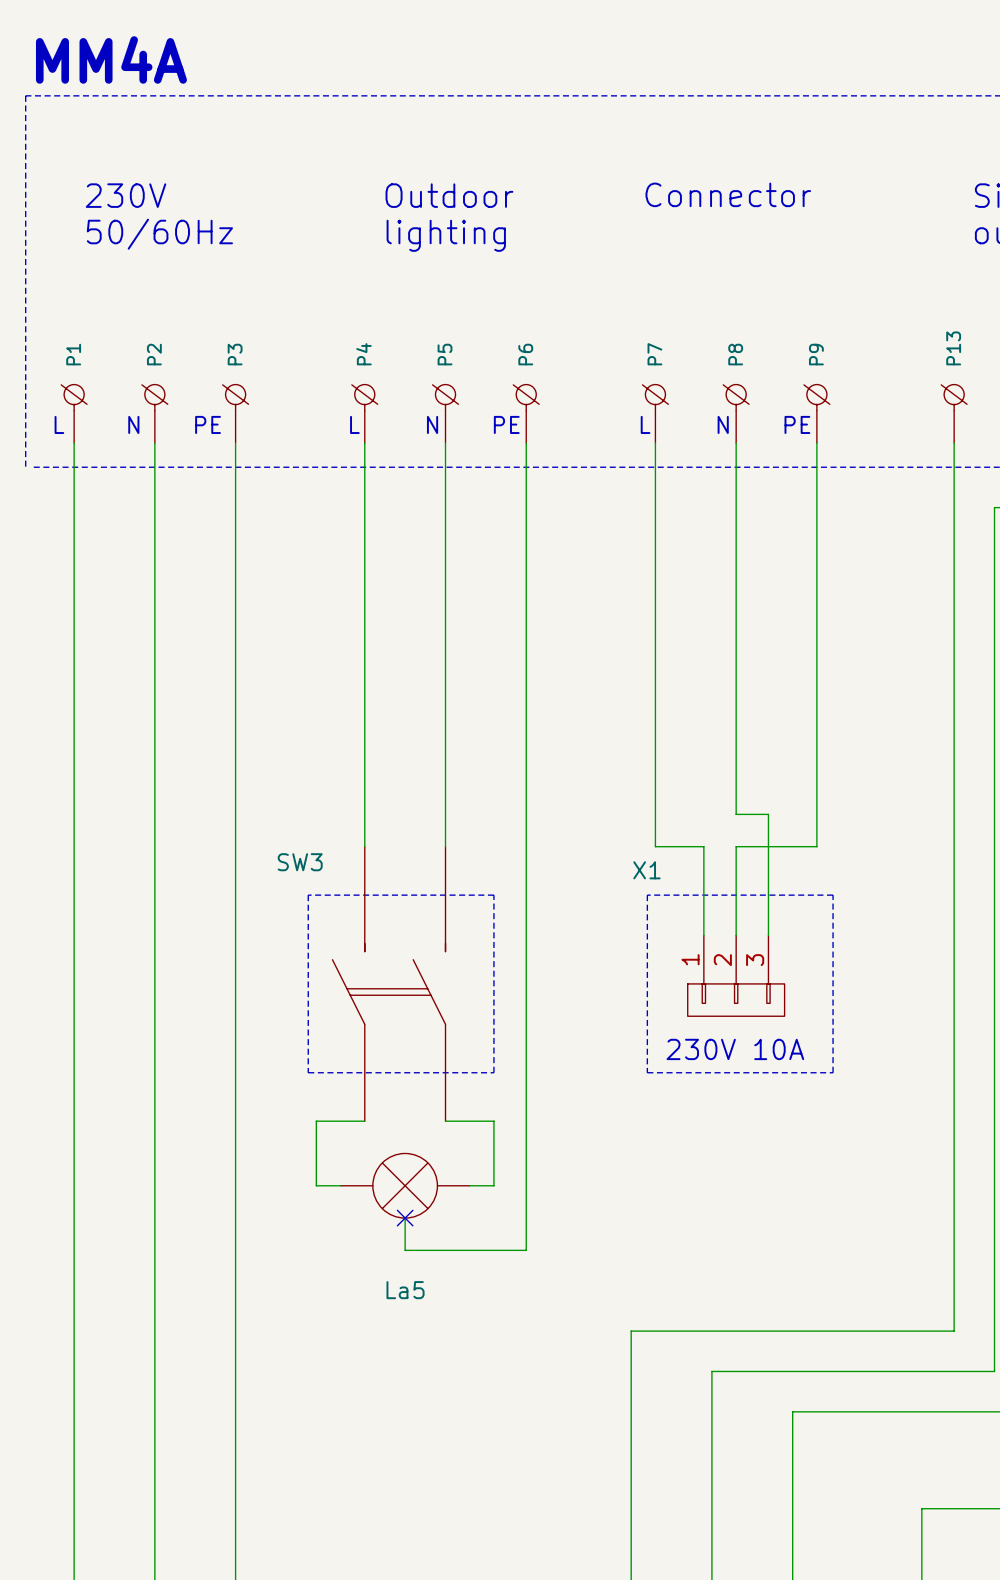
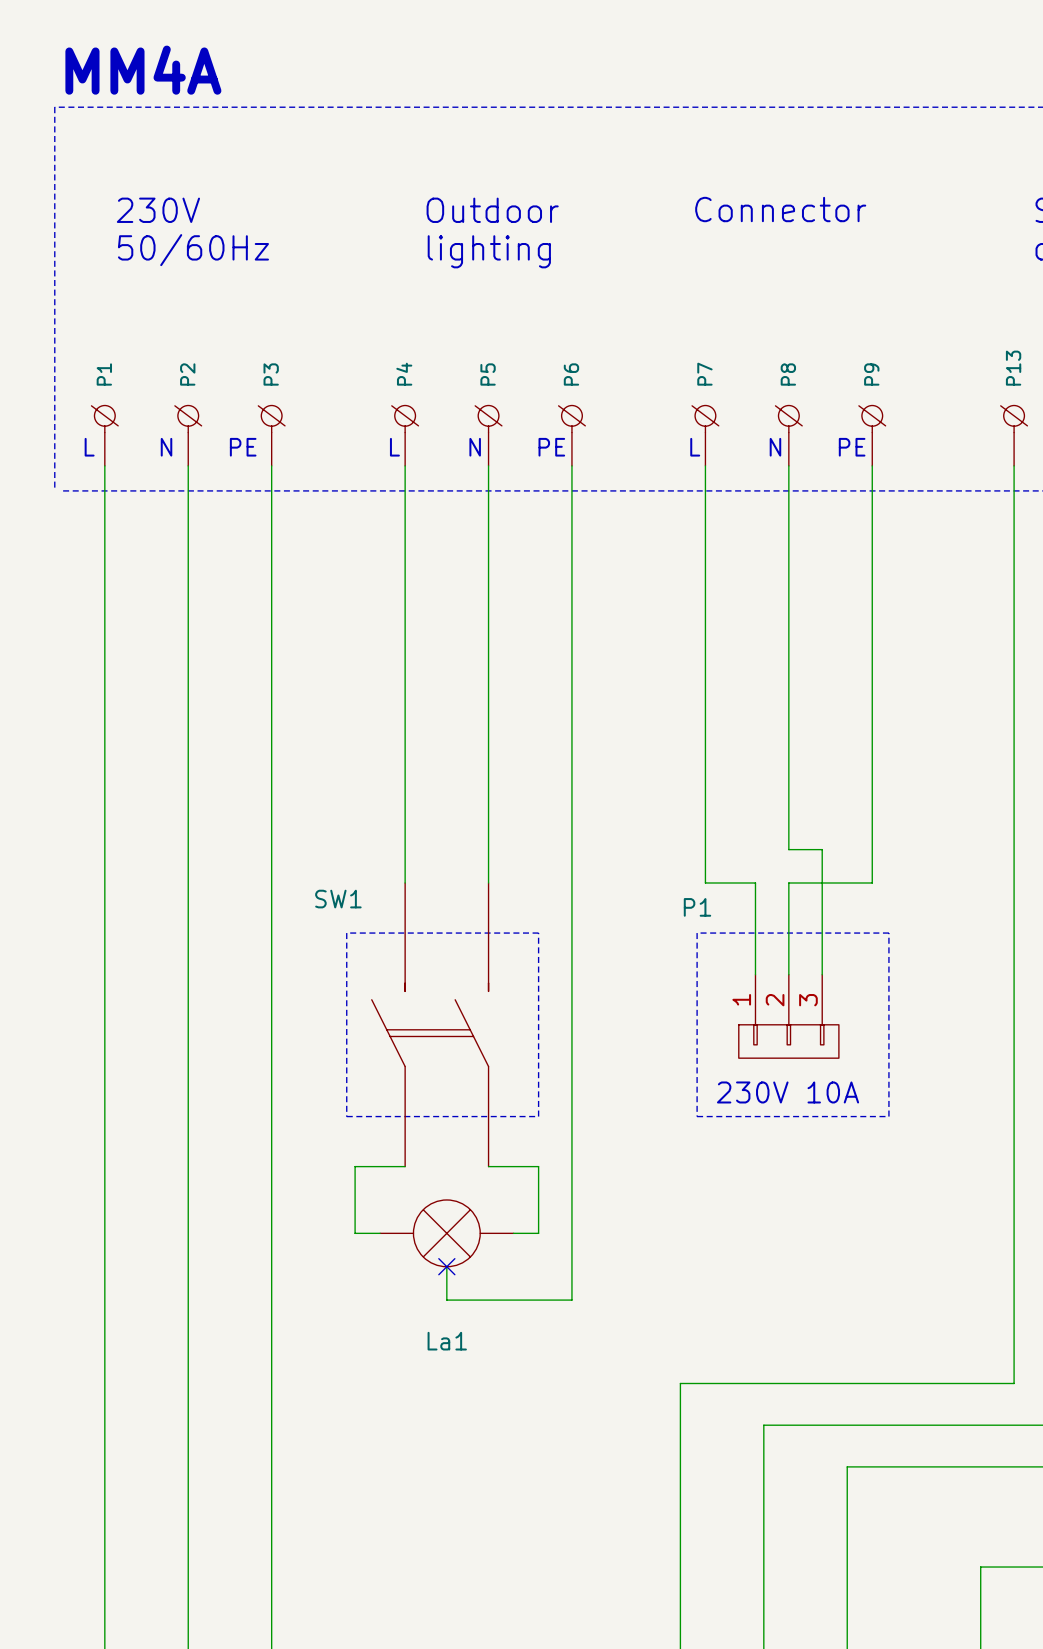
SW3 name: SW3 (300, 862) -> SW1 (338, 899)
X1 name: X1 (646, 870) -> P1 (697, 907)
La5 name: La5 (405, 1290) -> La1 (447, 1341)

